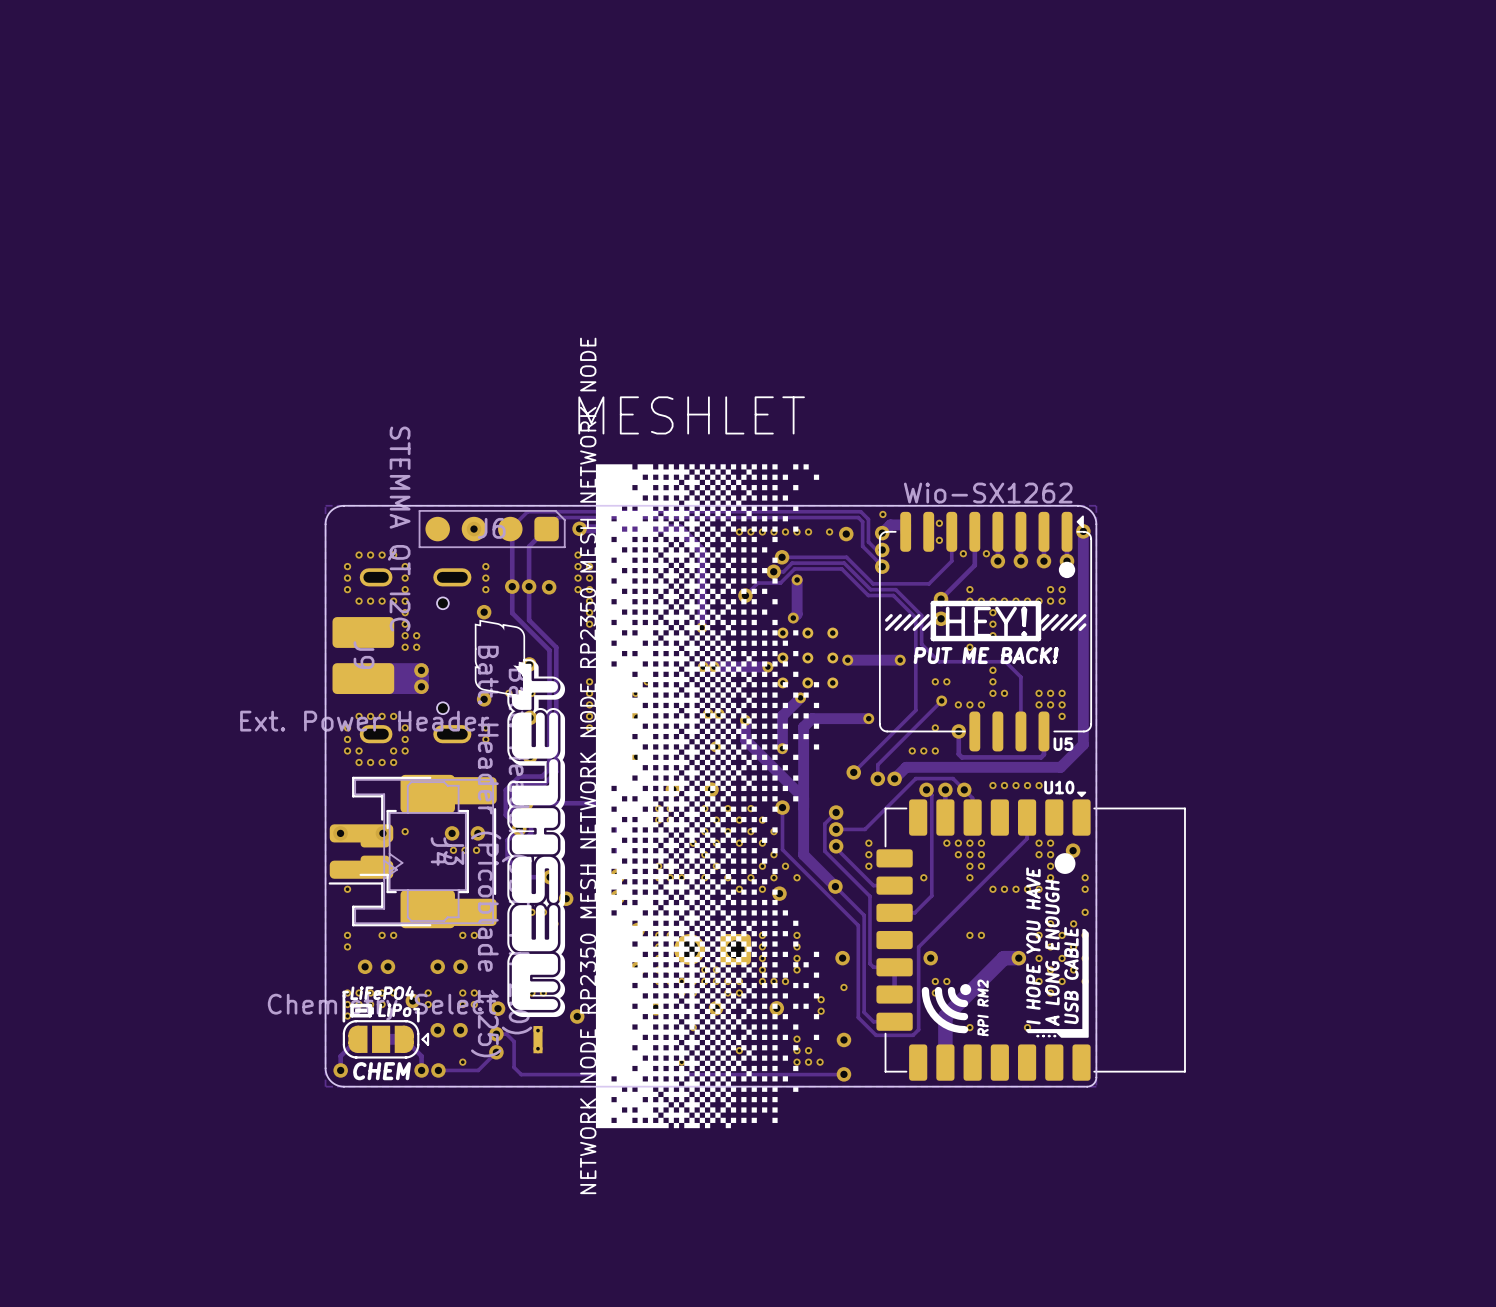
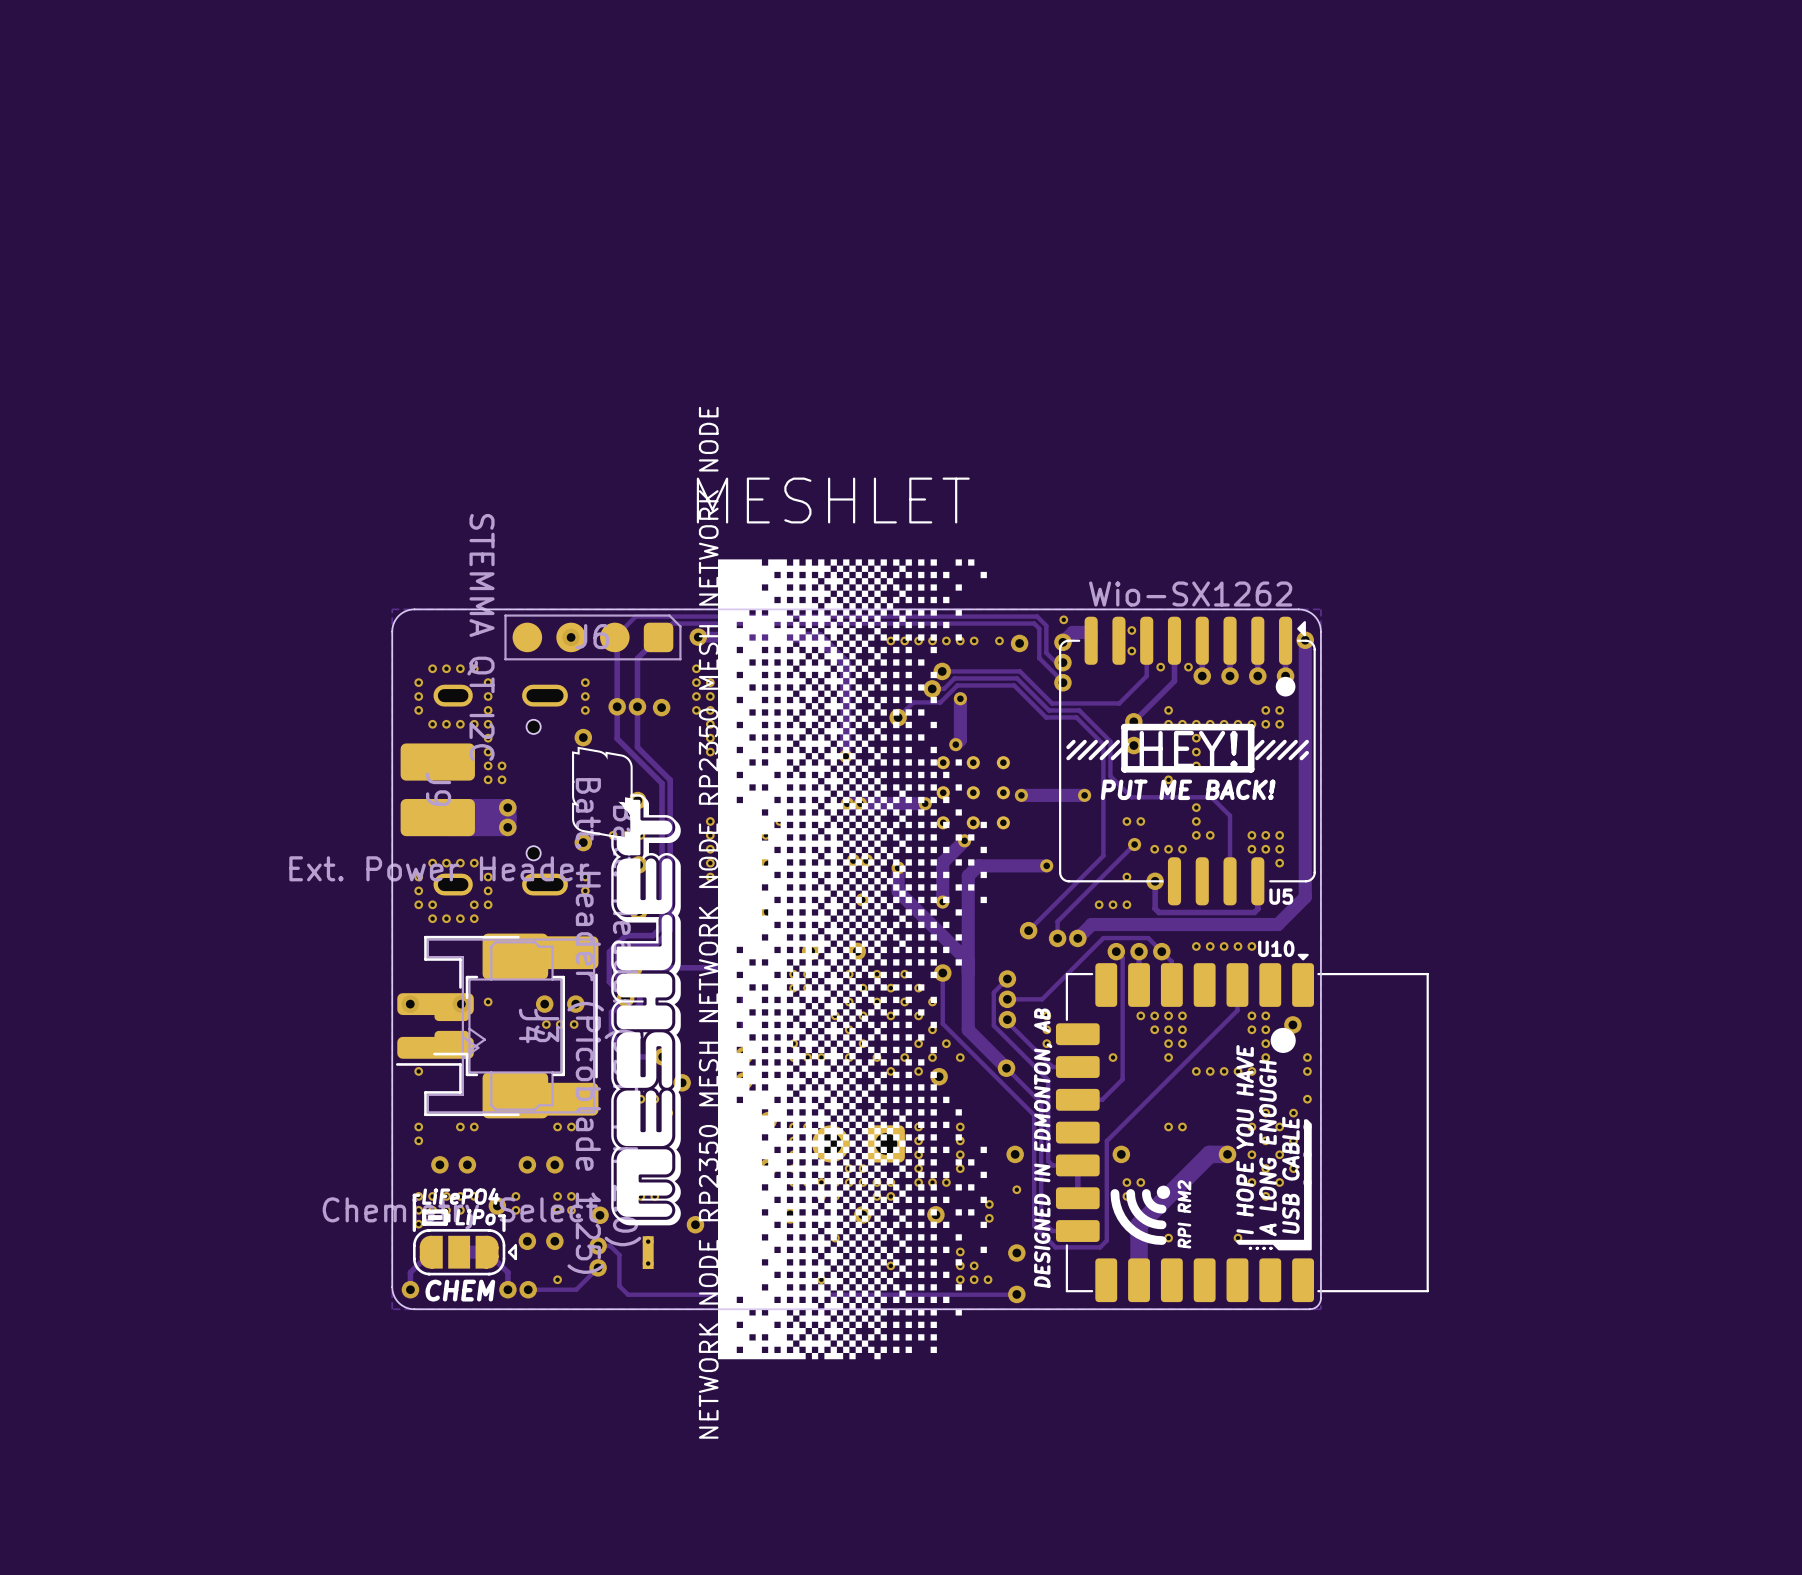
text: none -> DESIGNED IN EDMONTON, AB (1043, 1148)

